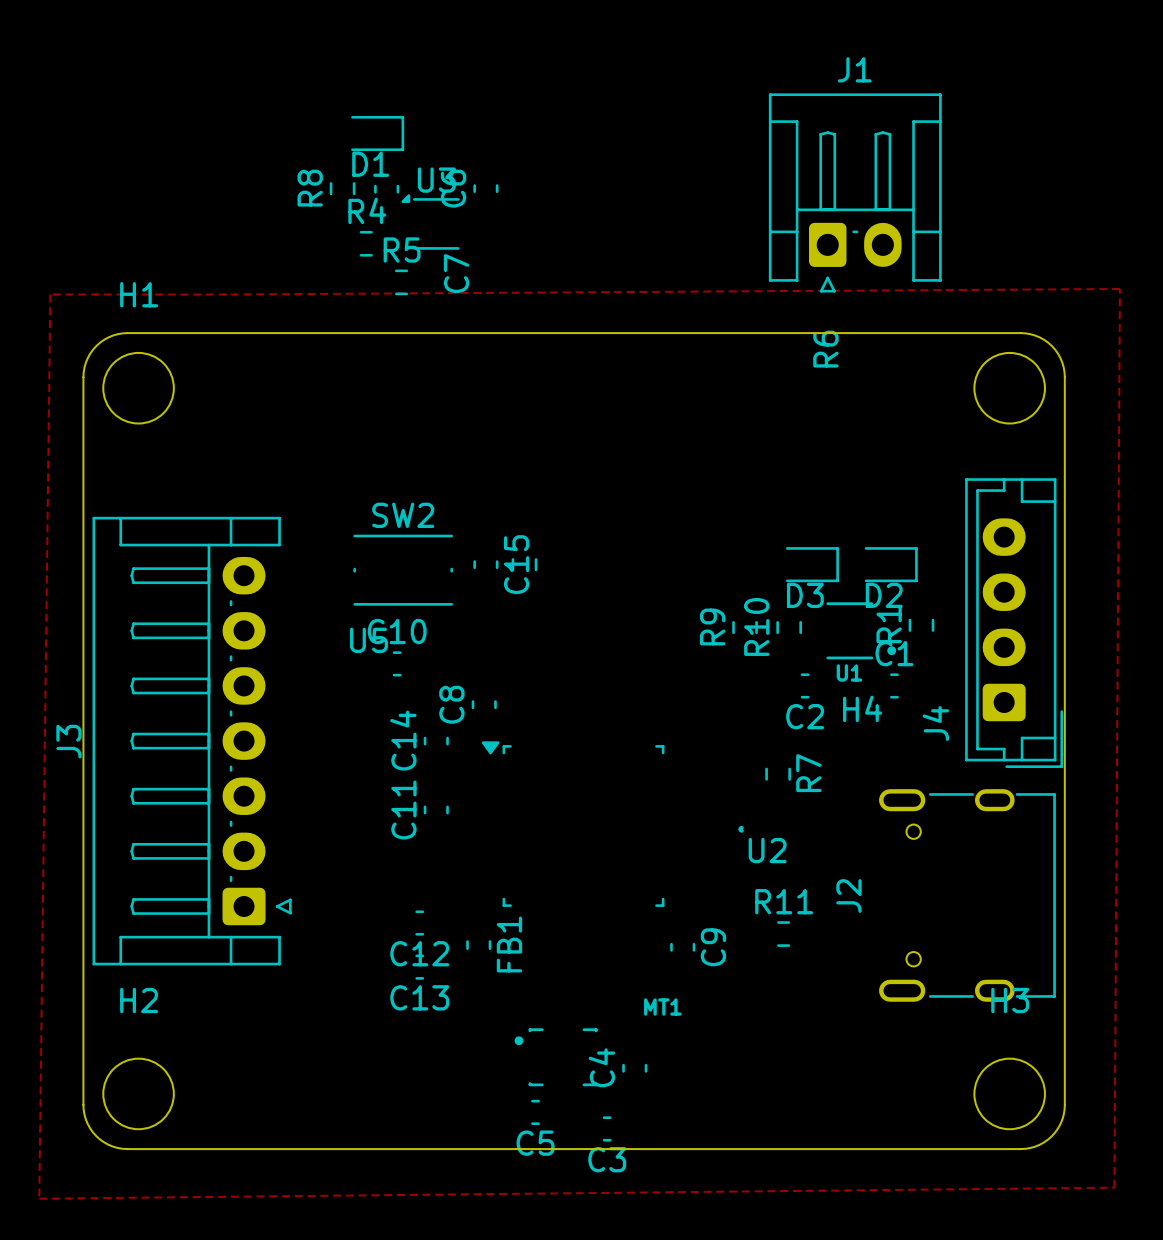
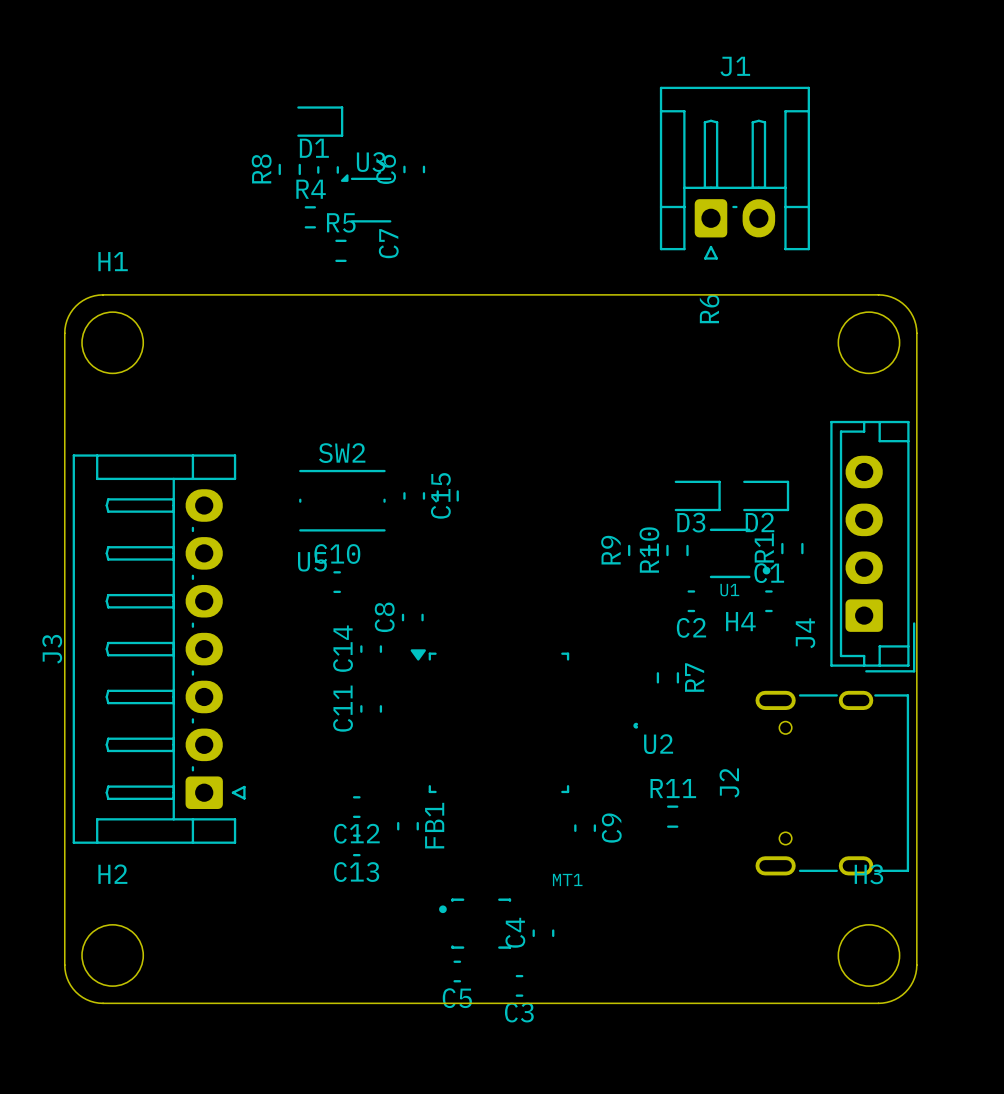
zone outline: (1119, 288) (1114, 1187) (39, 1198) (50, 294) (1119, 288) -> none

